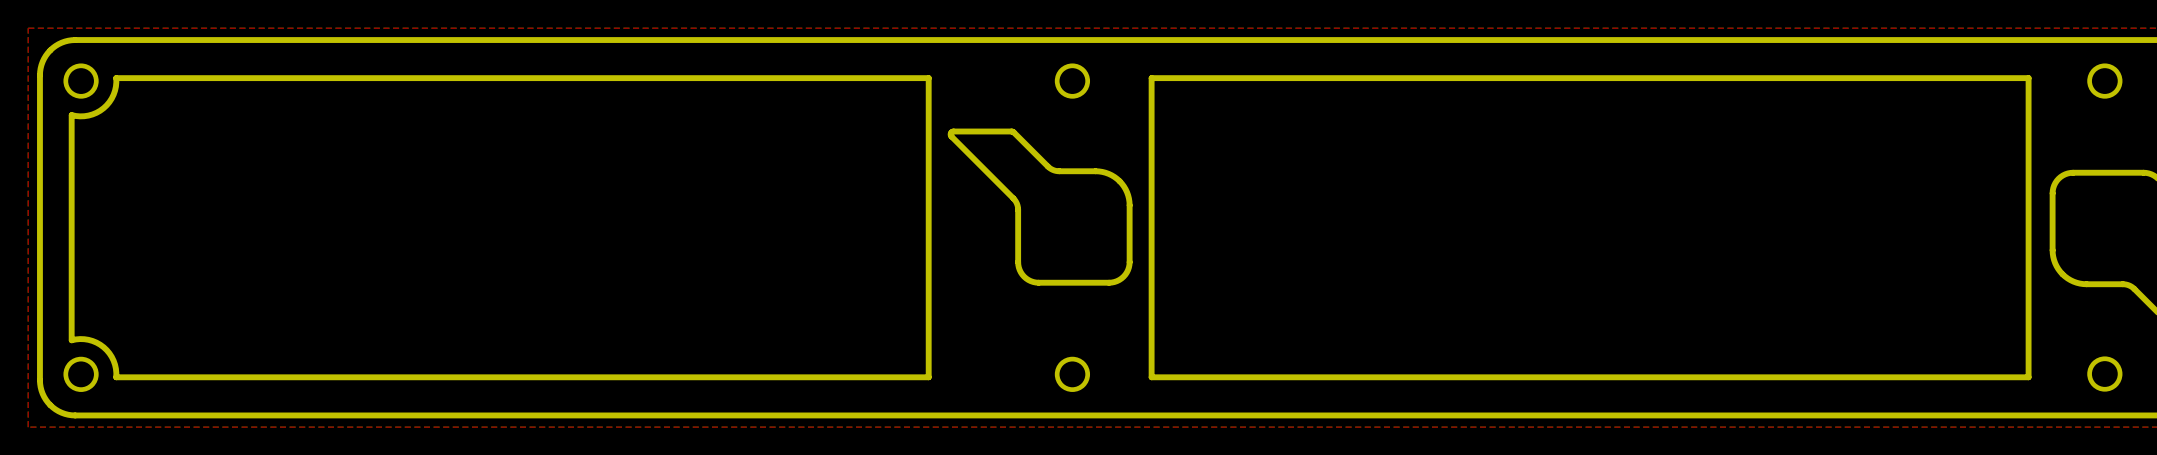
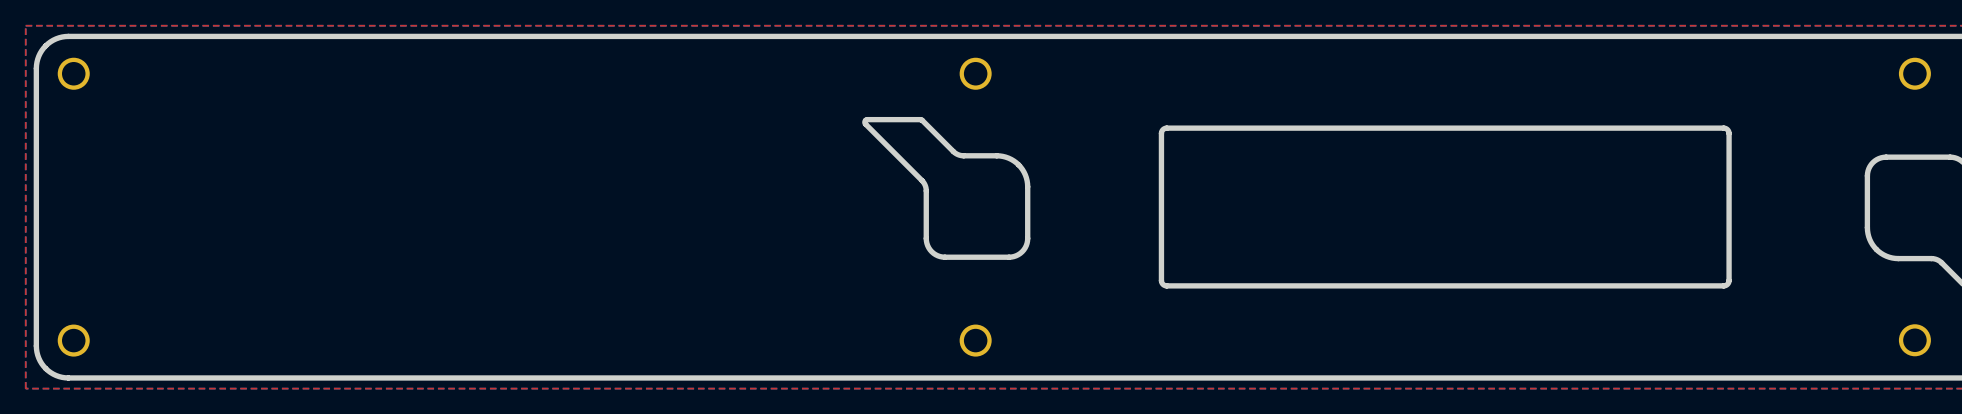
board edge: (1151, 78) (2028, 78) (2028, 377) (1151, 377) (1151, 78) -> none
board edge: (71, 115) (71, 340) -> none
board edge: (71, 115) (88, 115) (103, 108) (113, 94) (116, 78) (928, 78) (928, 377) (116, 377) (113, 360) (103, 347) (88, 339) (71, 340) -> none
board edge: none -> (1166, 128) (1725, 128) (1729, 133) (1728, 281) (1723, 285) (1165, 285) (1161, 280) (1161, 133) (1163, 129) (1166, 128)

